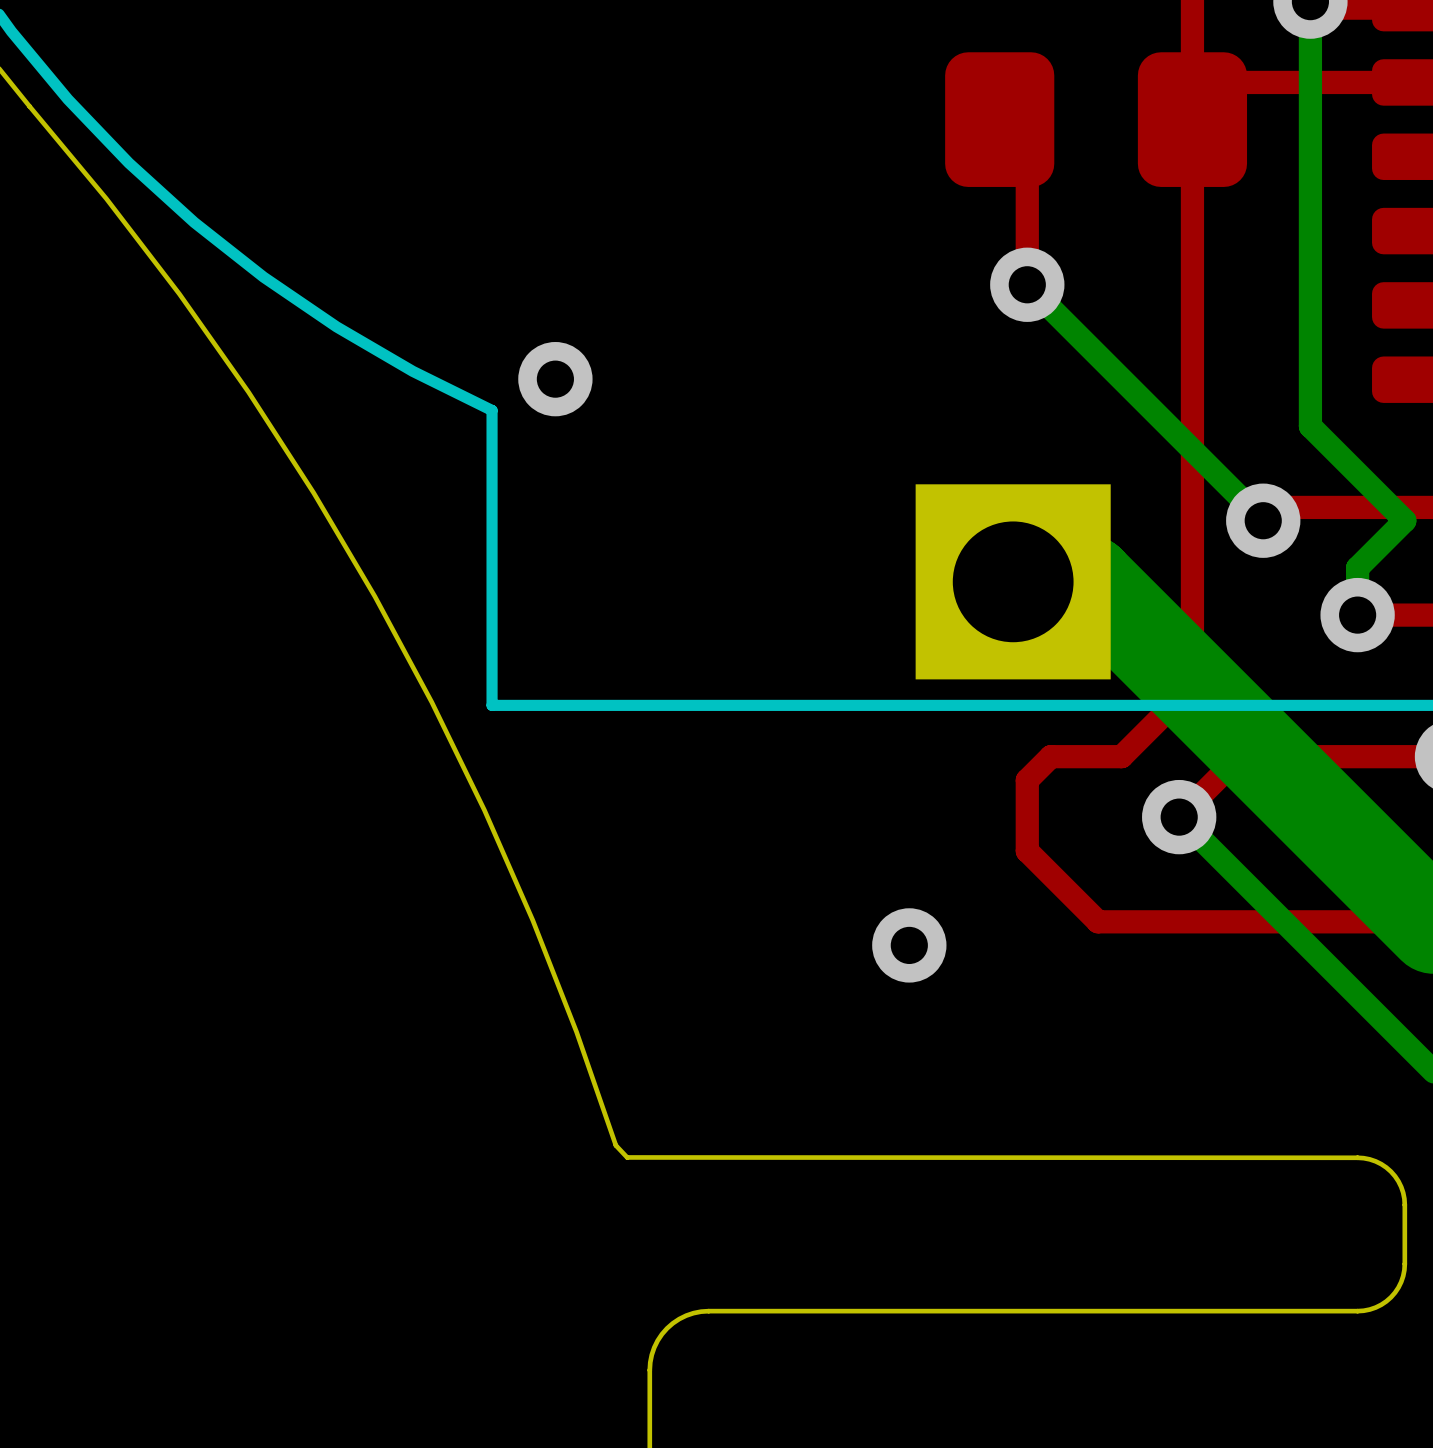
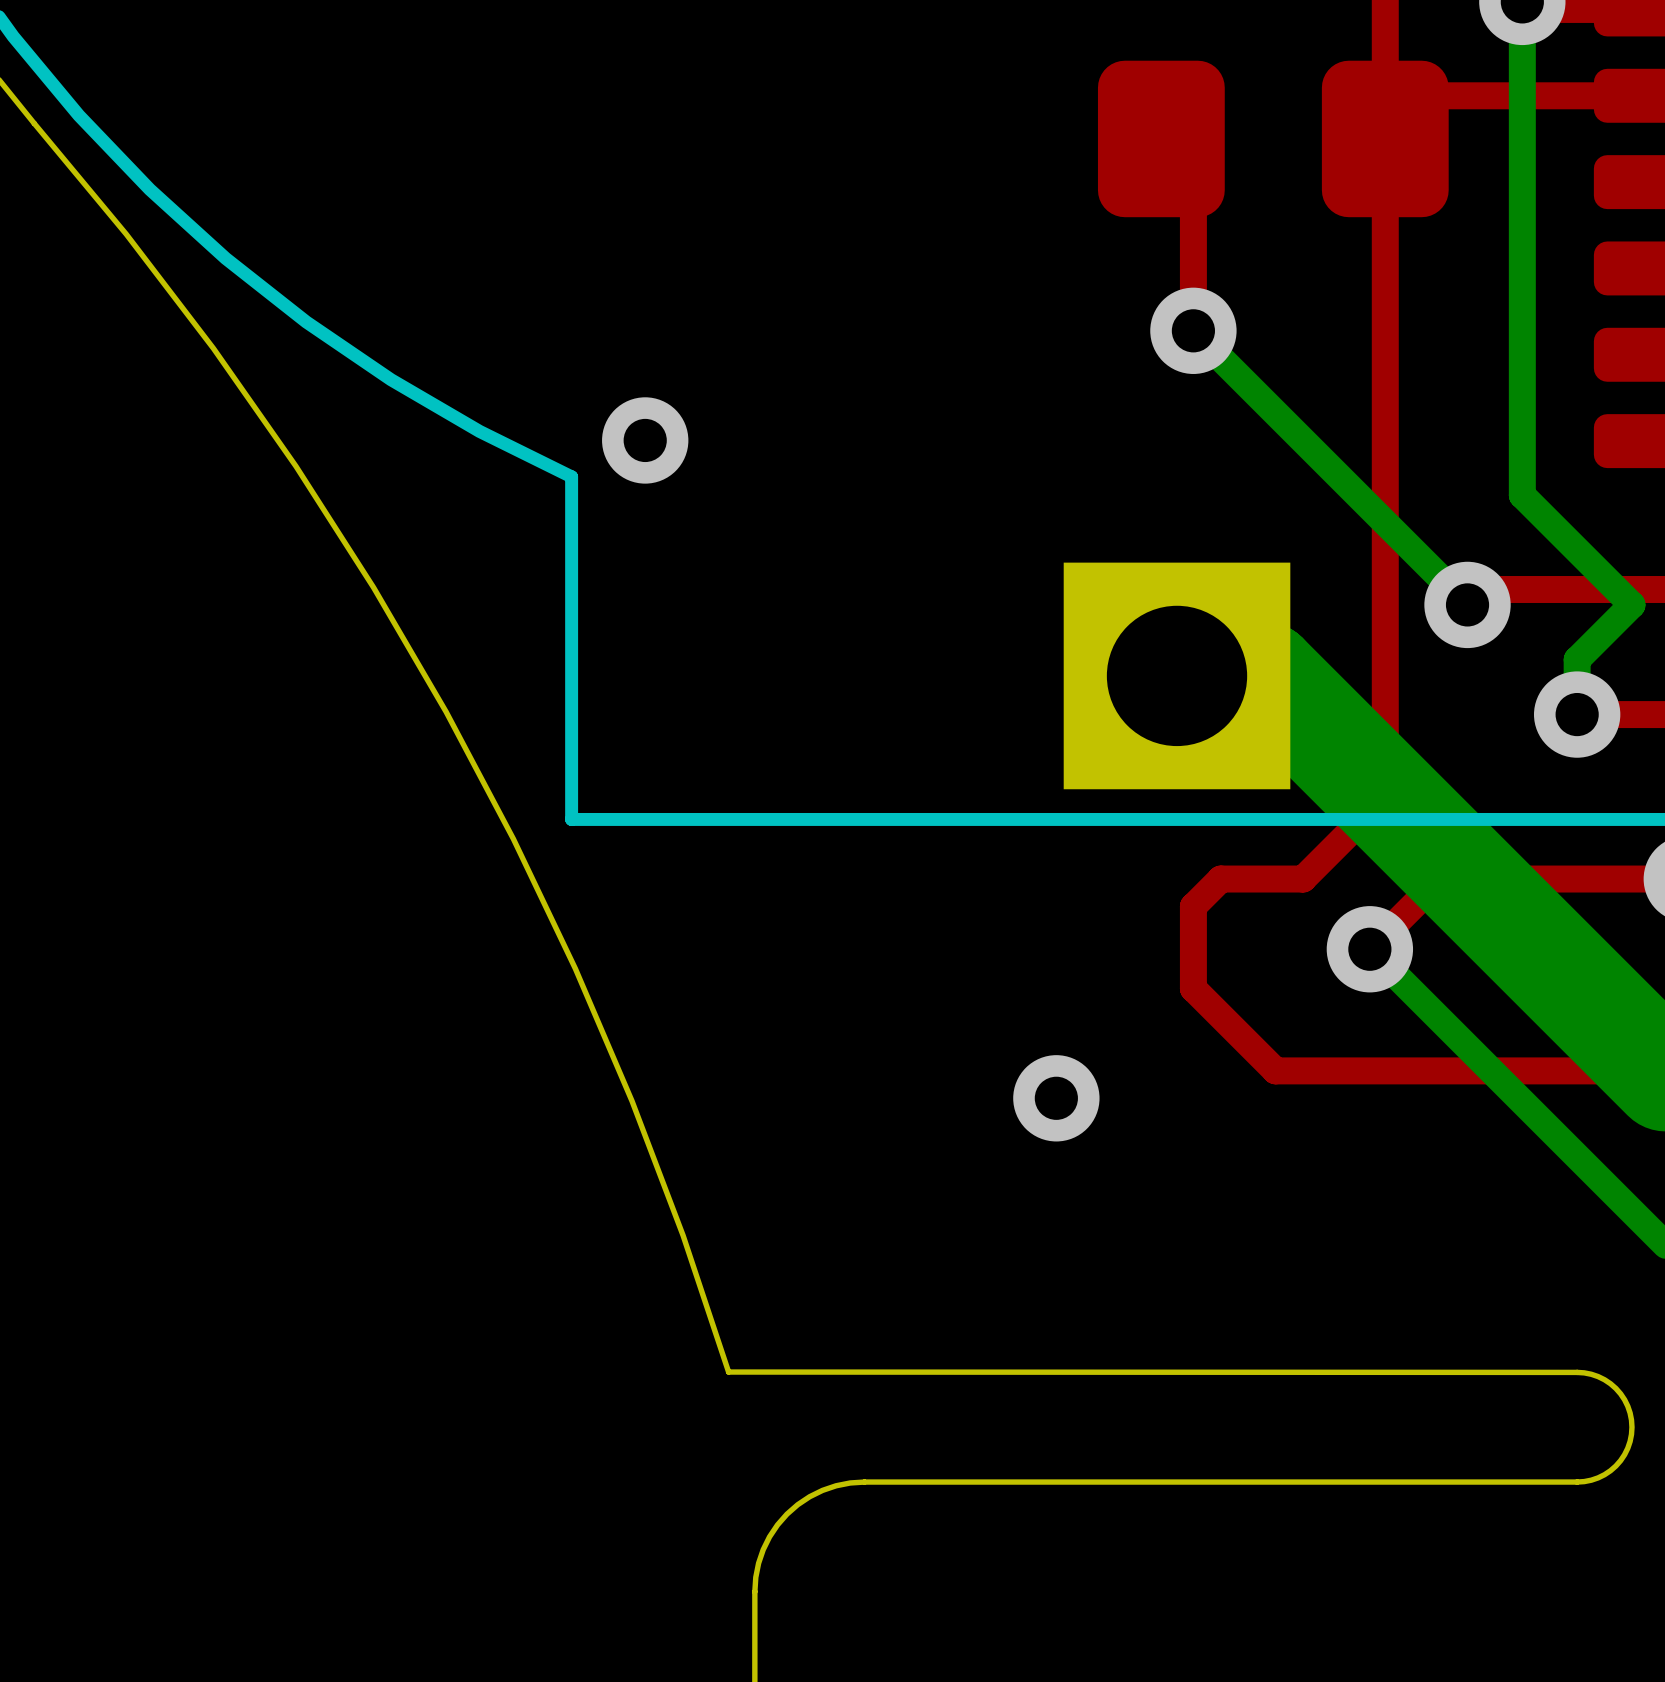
board edge: (29, 106) (106, 198) (179, 293) (248, 392) (313, 492) (374, 596) (431, 702) (484, 810) (532, 920) (576, 1031) (615, 1145) (627, 1157) (1357, 1157) (1369, 1159) (1386, 1167) (1398, 1181) (1403, 1192) (1404, 1204) (1403, 1276) (1398, 1287) (1390, 1297) (1381, 1304) (1369, 1309) (1357, 1311) (701, 1311) (679, 1319) (661, 1334) (654, 1347) (649, 1370) -> (34, 123) (126, 234) (213, 348) (295, 466) (373, 587) (446, 711) (513, 838) (575, 968) (632, 1101) (683, 1235) (728, 1372) (1577, 1372) (1591, 1374) (1610, 1383) (1624, 1399) (1630, 1413) (1631, 1427) (1630, 1441) (1620, 1460) (1604, 1474) (1584, 1481) (864, 1482) (836, 1485) (809, 1496) (786, 1514) (777, 1524) (763, 1549) (755, 1577) (754, 1591)

